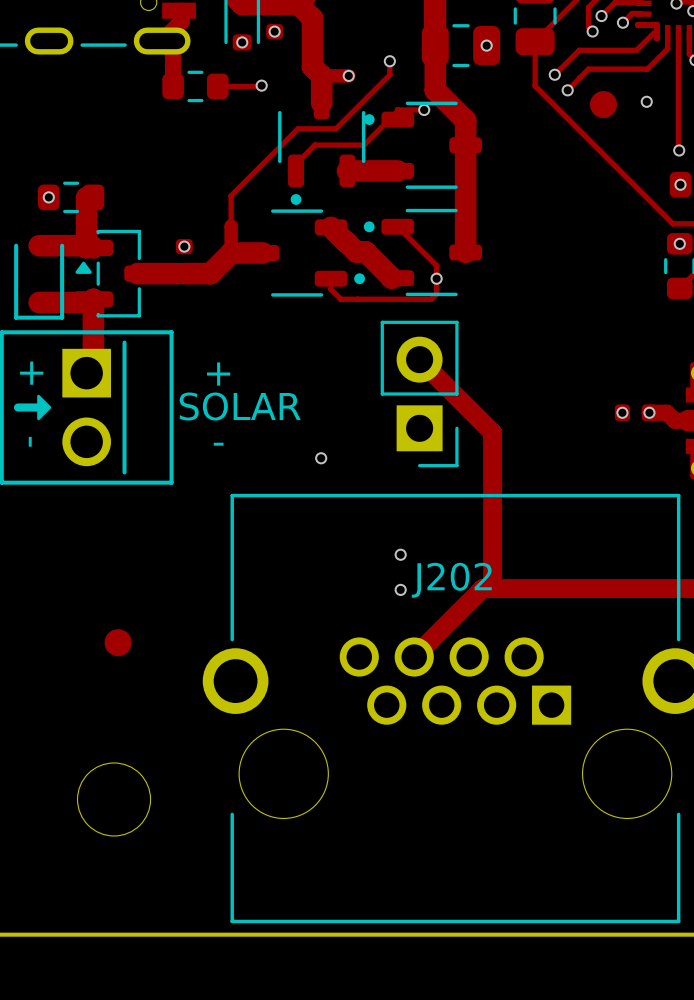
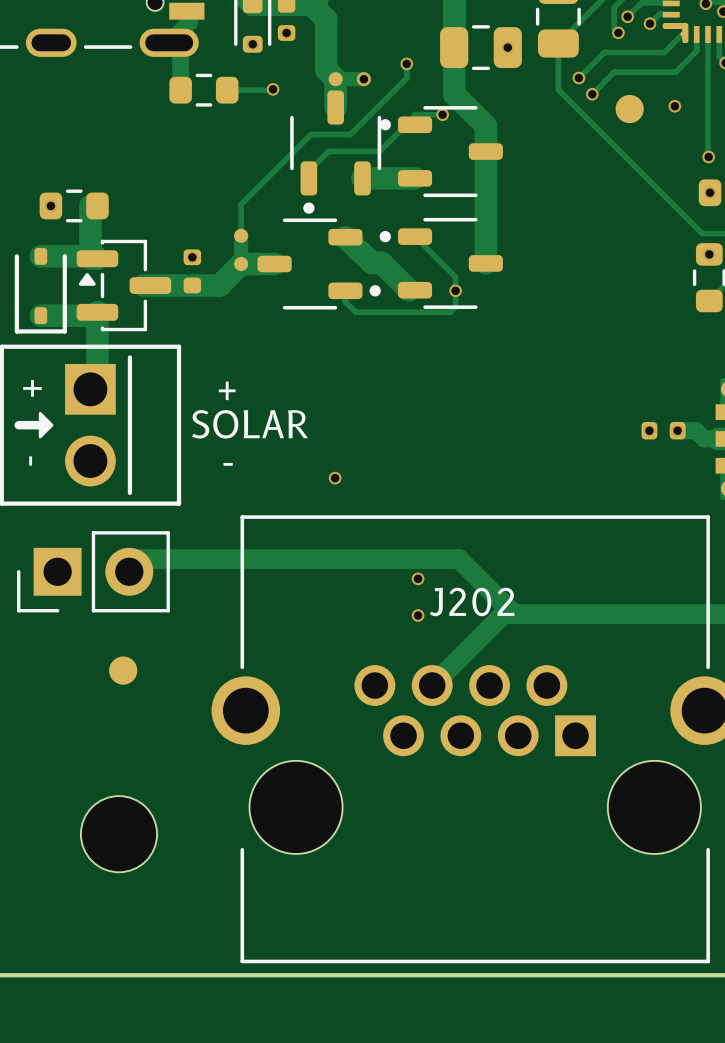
track: (419, 359) (492, 432) (492, 588) -> (129, 571) (141, 559) (458, 559) (514, 614)
part rotation: 0° (419, 393) -> 90° clockwise (93, 571)
part position: (419, 393) -> (93, 571)

